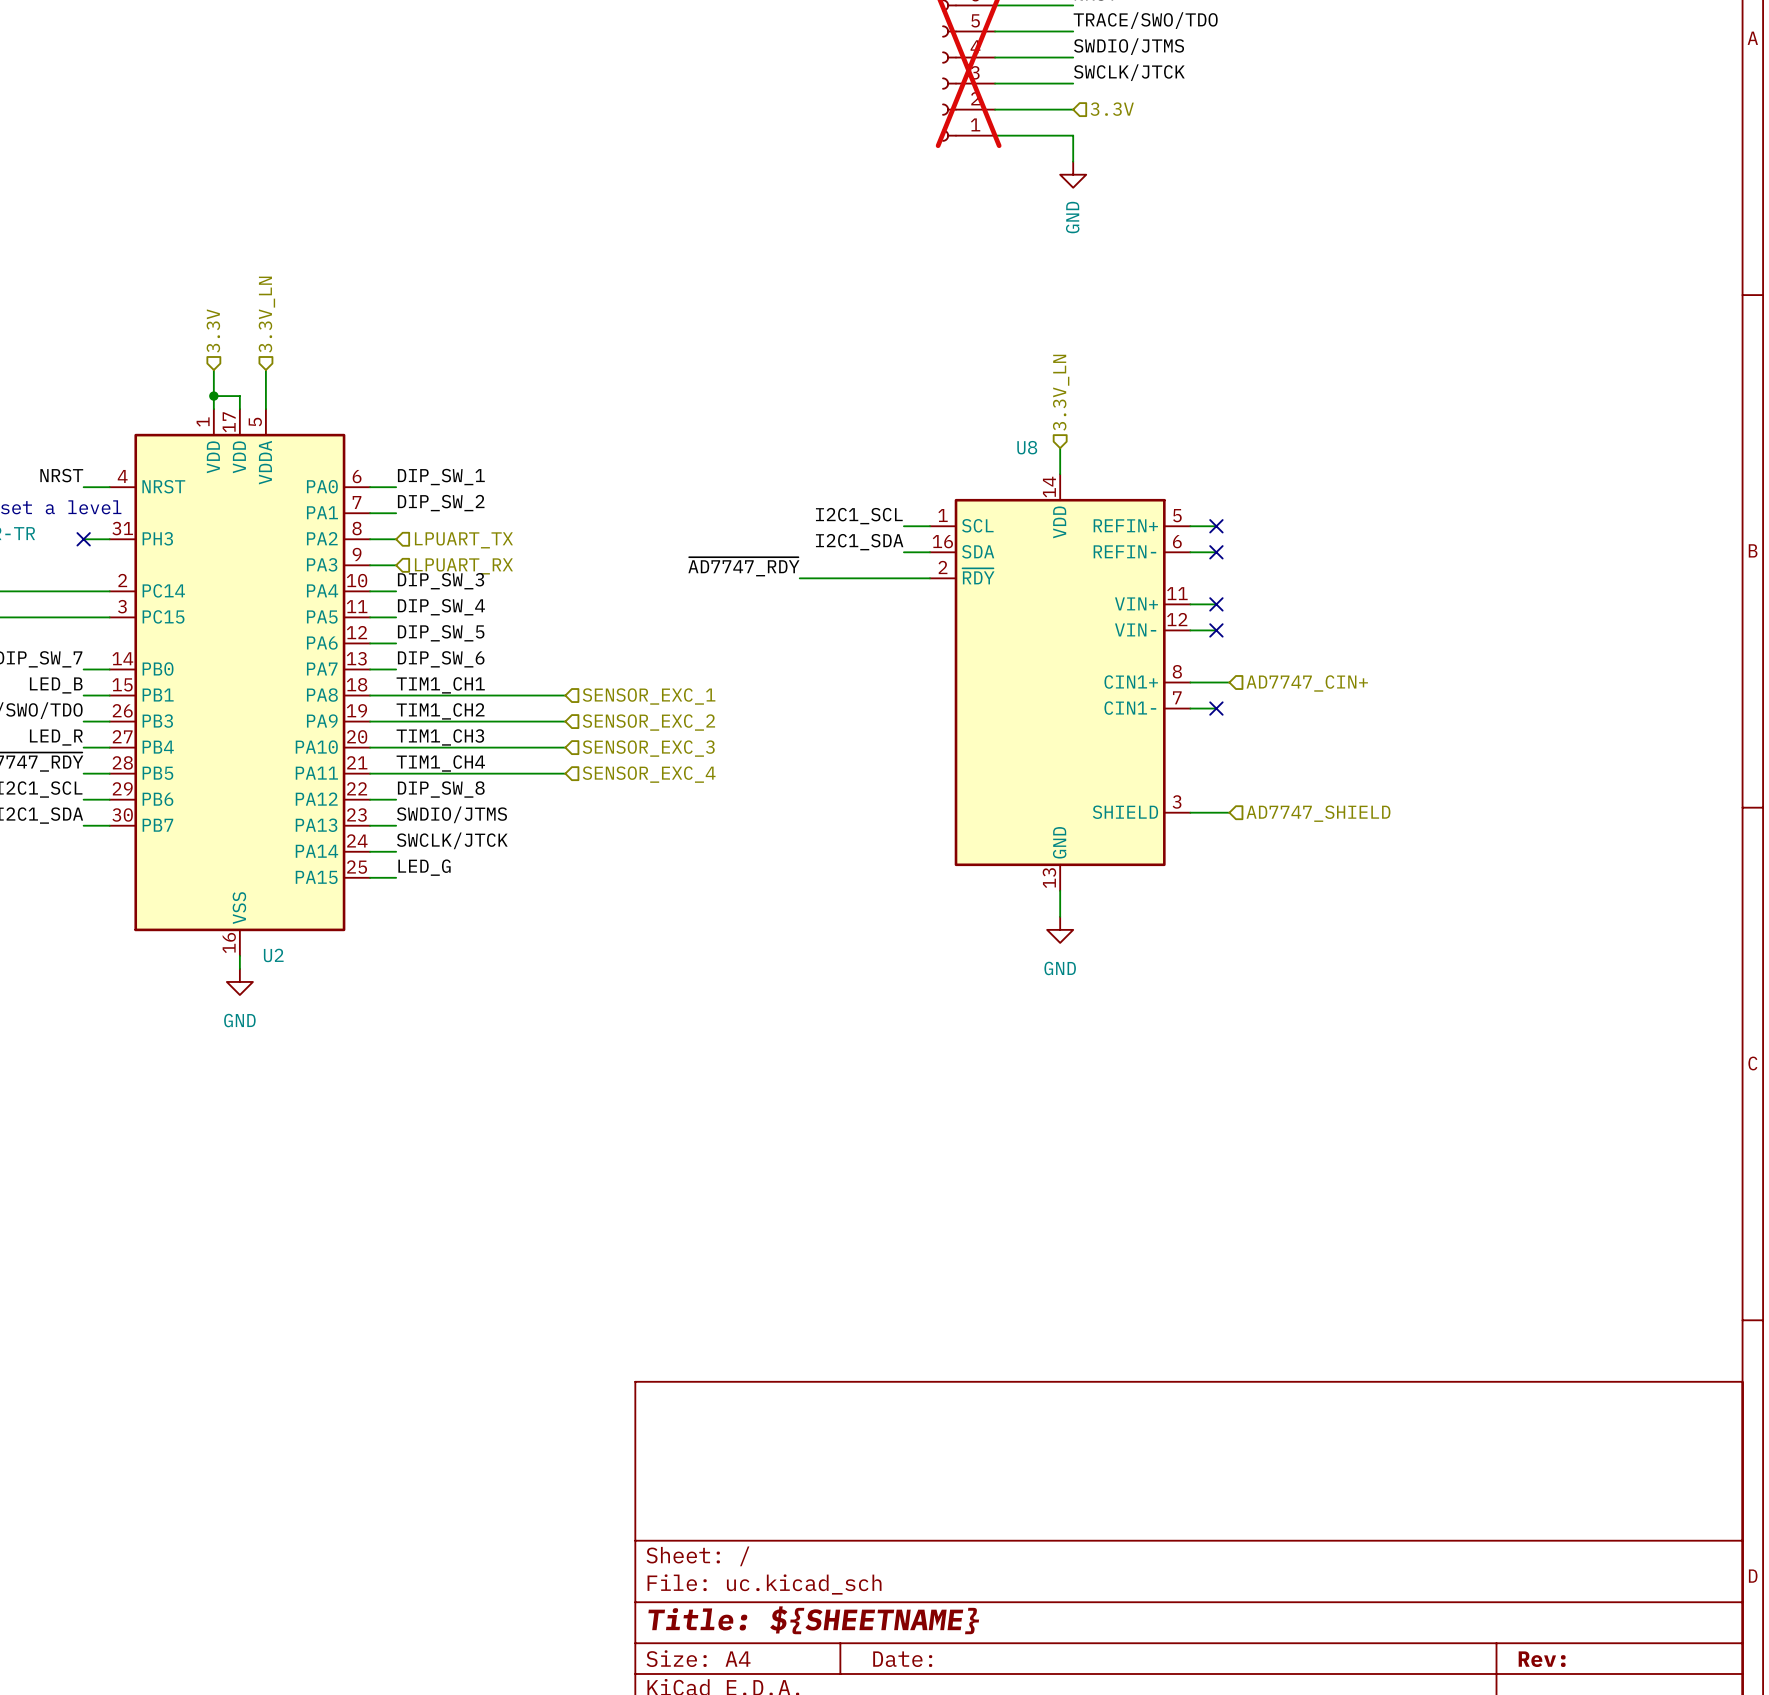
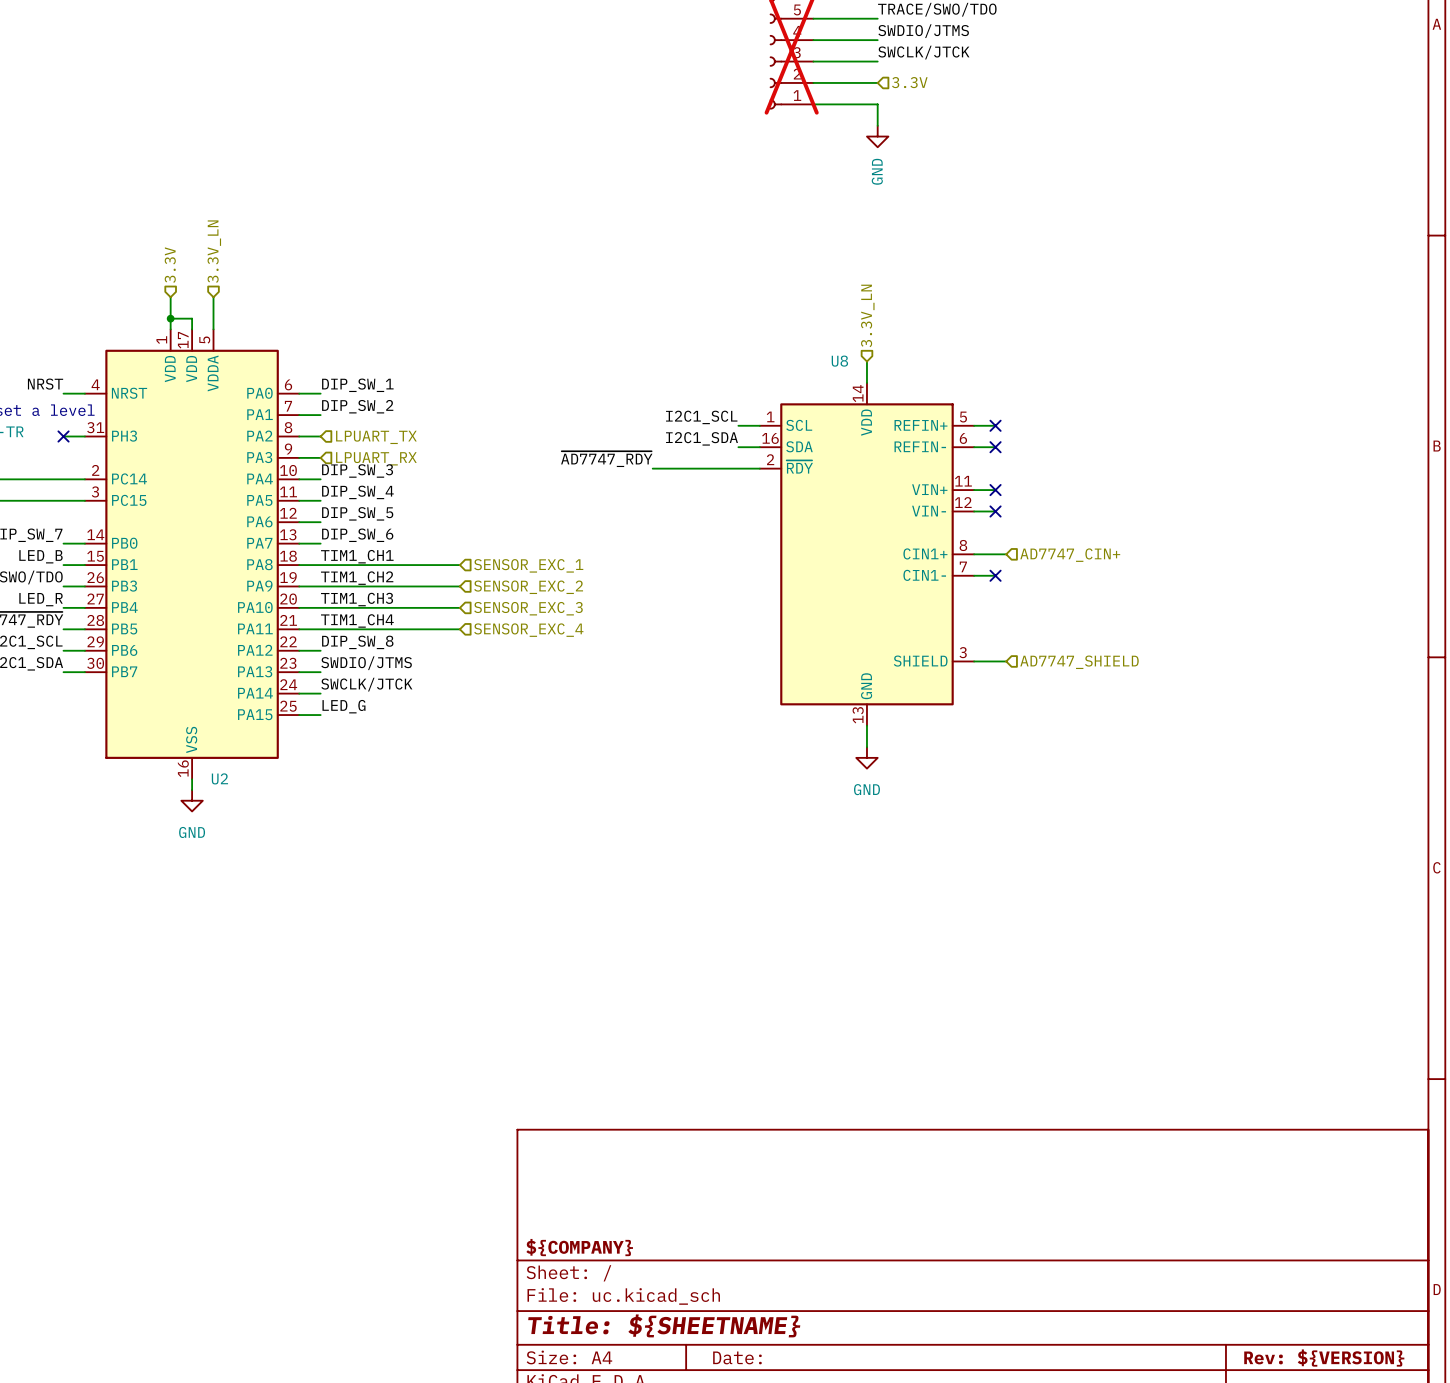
title block: none -> ${COMPANY} (579, 1247)
title block: Rev: (1542, 1659) -> Rev: ${VERSION} (1324, 1358)

